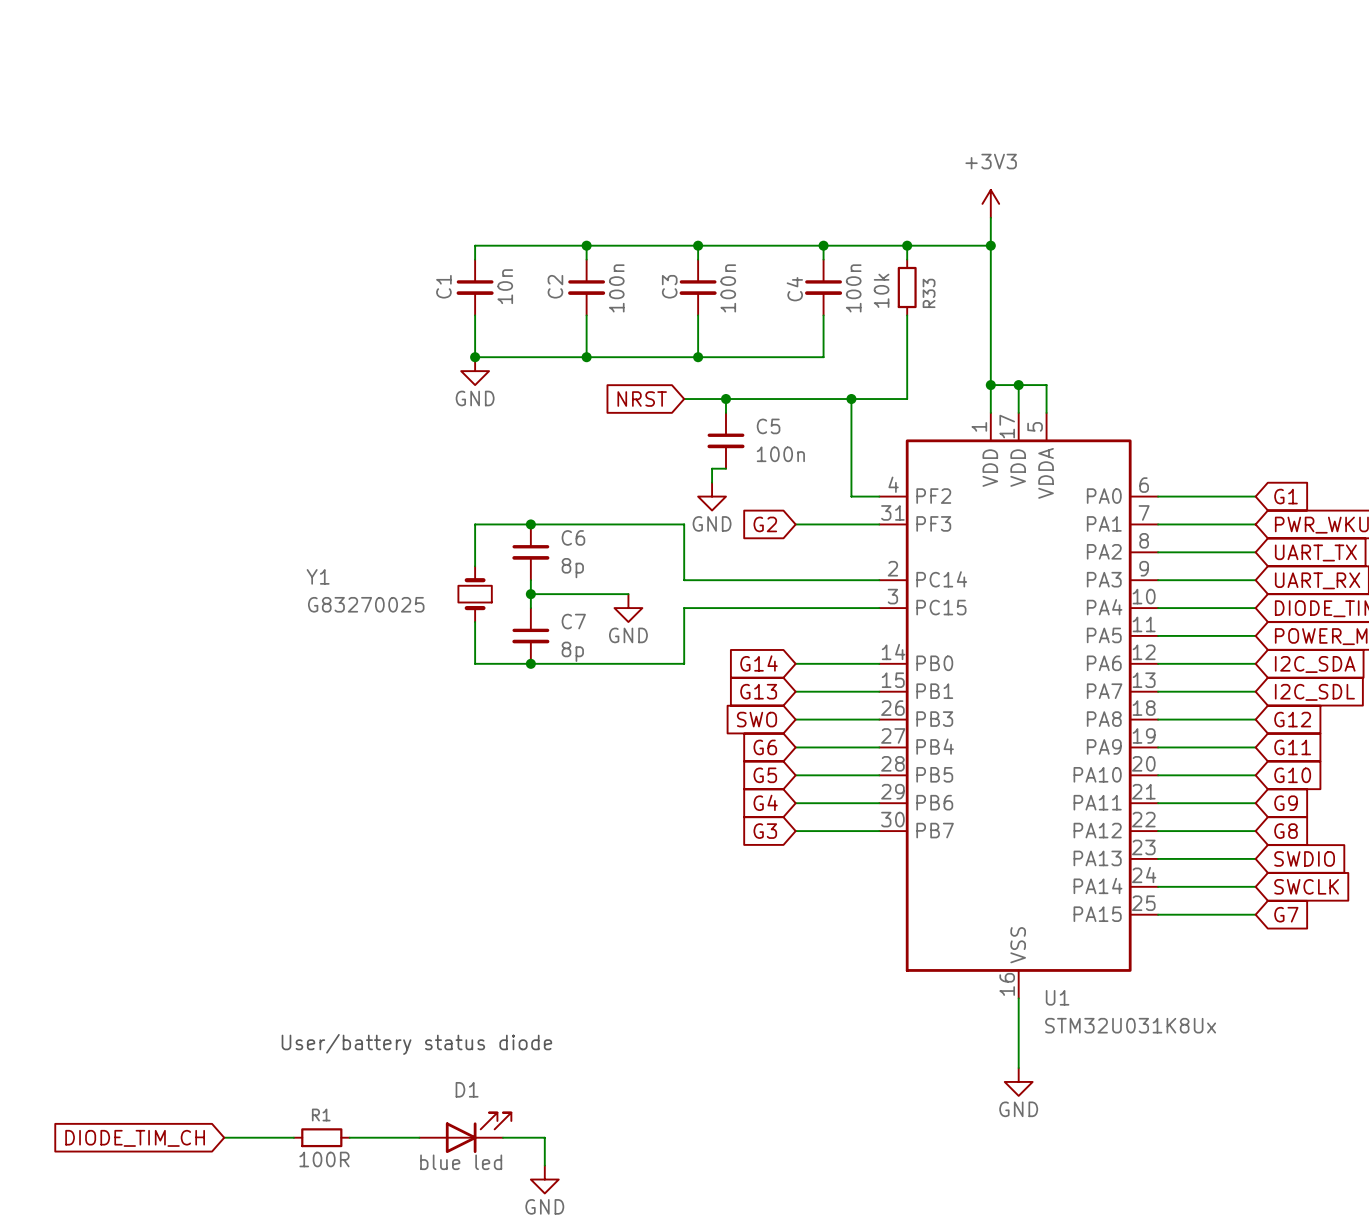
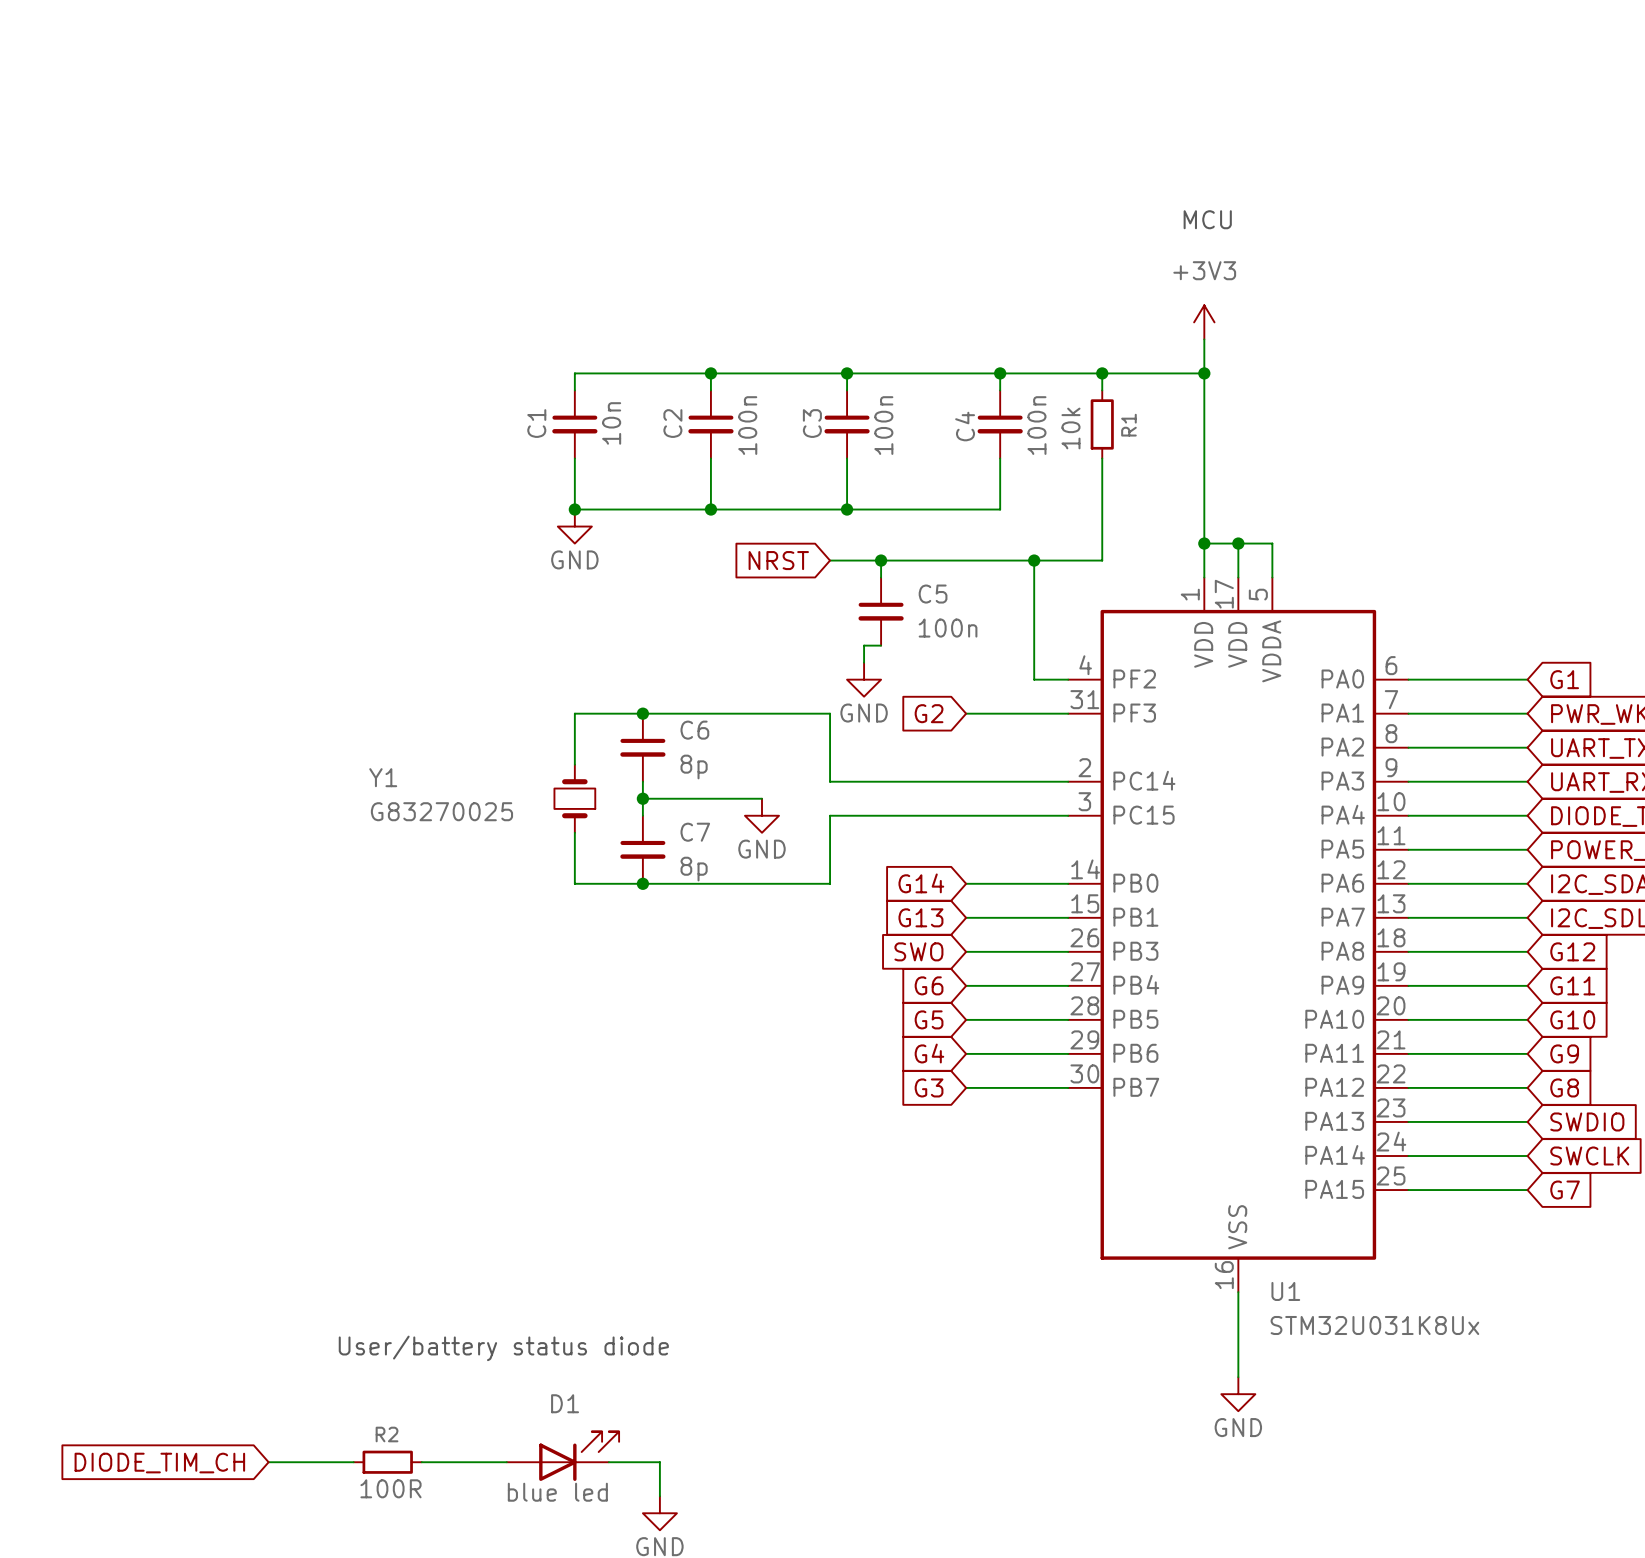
text: none -> MCU (1207, 219)
R33 name: R33 (929, 293) -> R1 (1128, 425)
R1 name: R1 (321, 1114) -> R2 (387, 1434)

